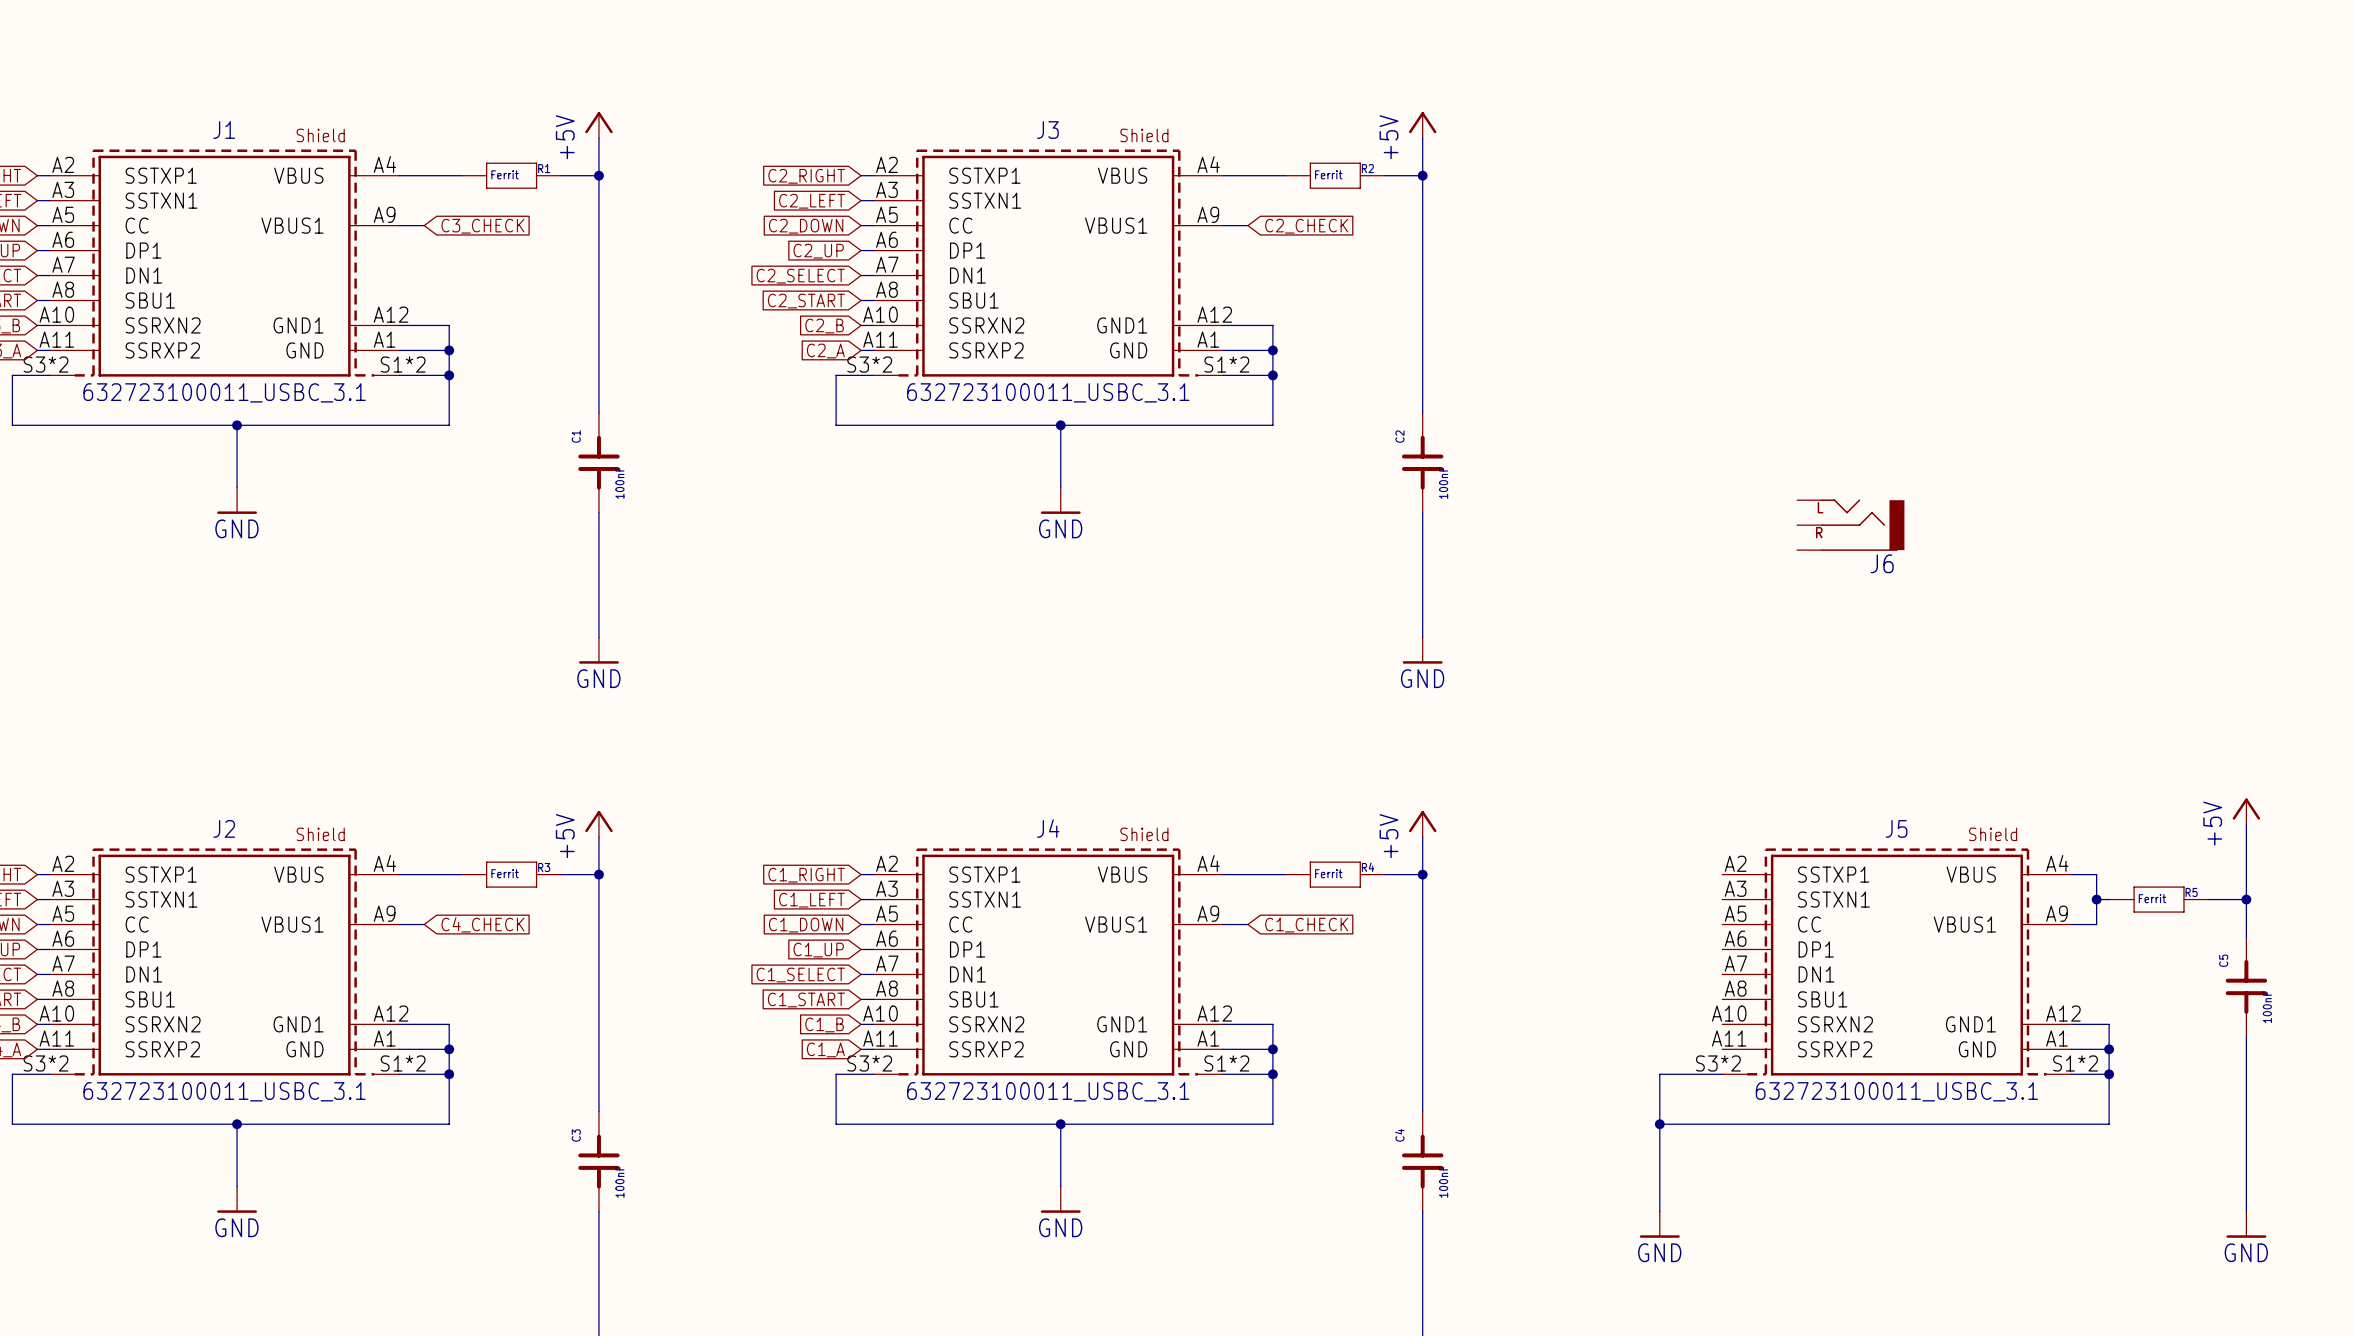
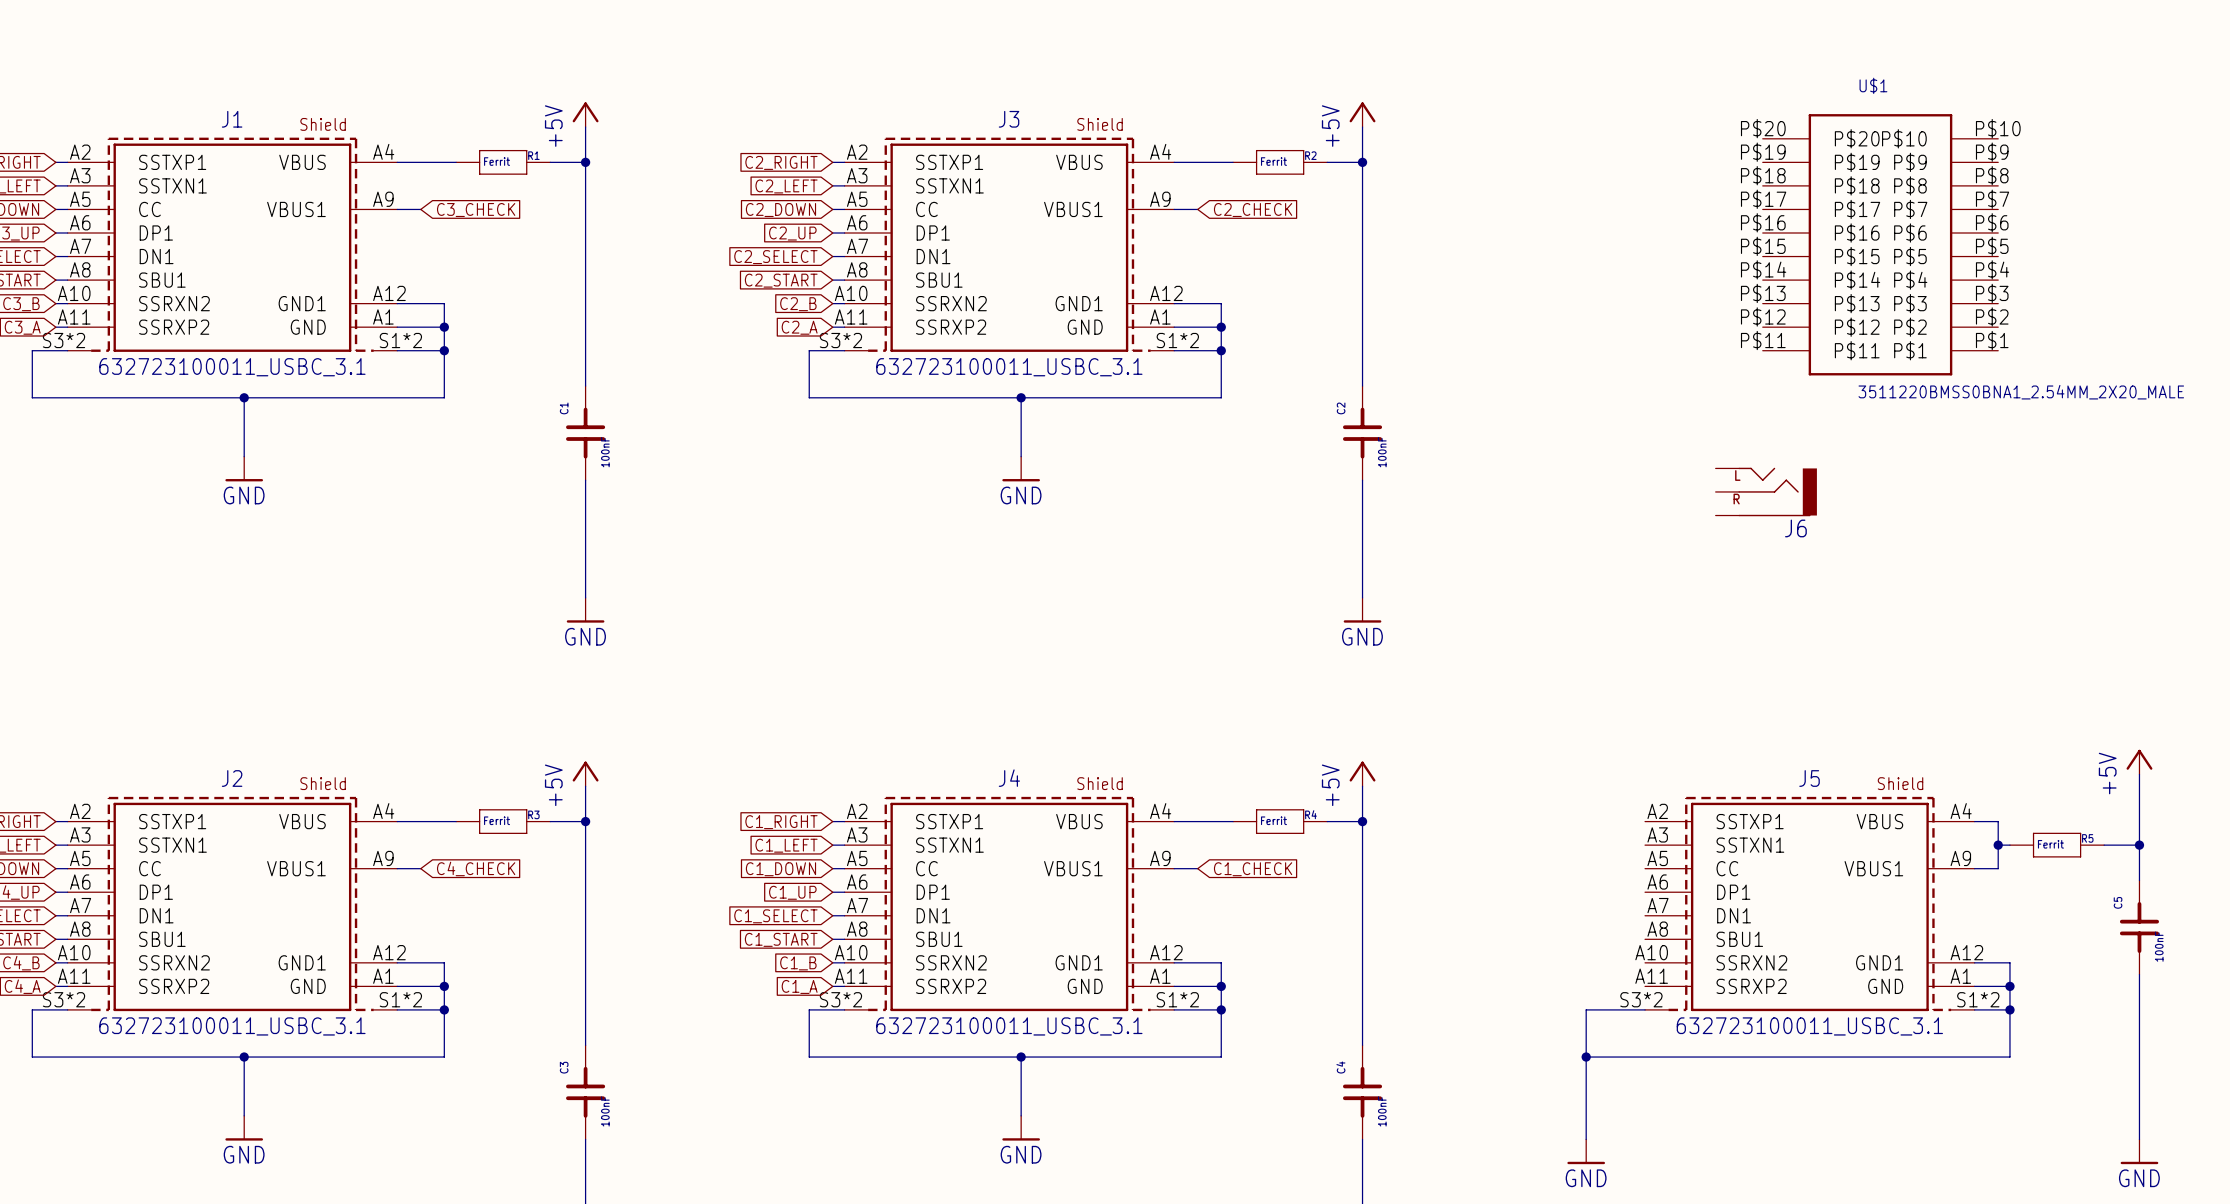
U$1: none -> 3511220BMSS0BNA1_2.54MM_2X20_MALE (1880, 244)

